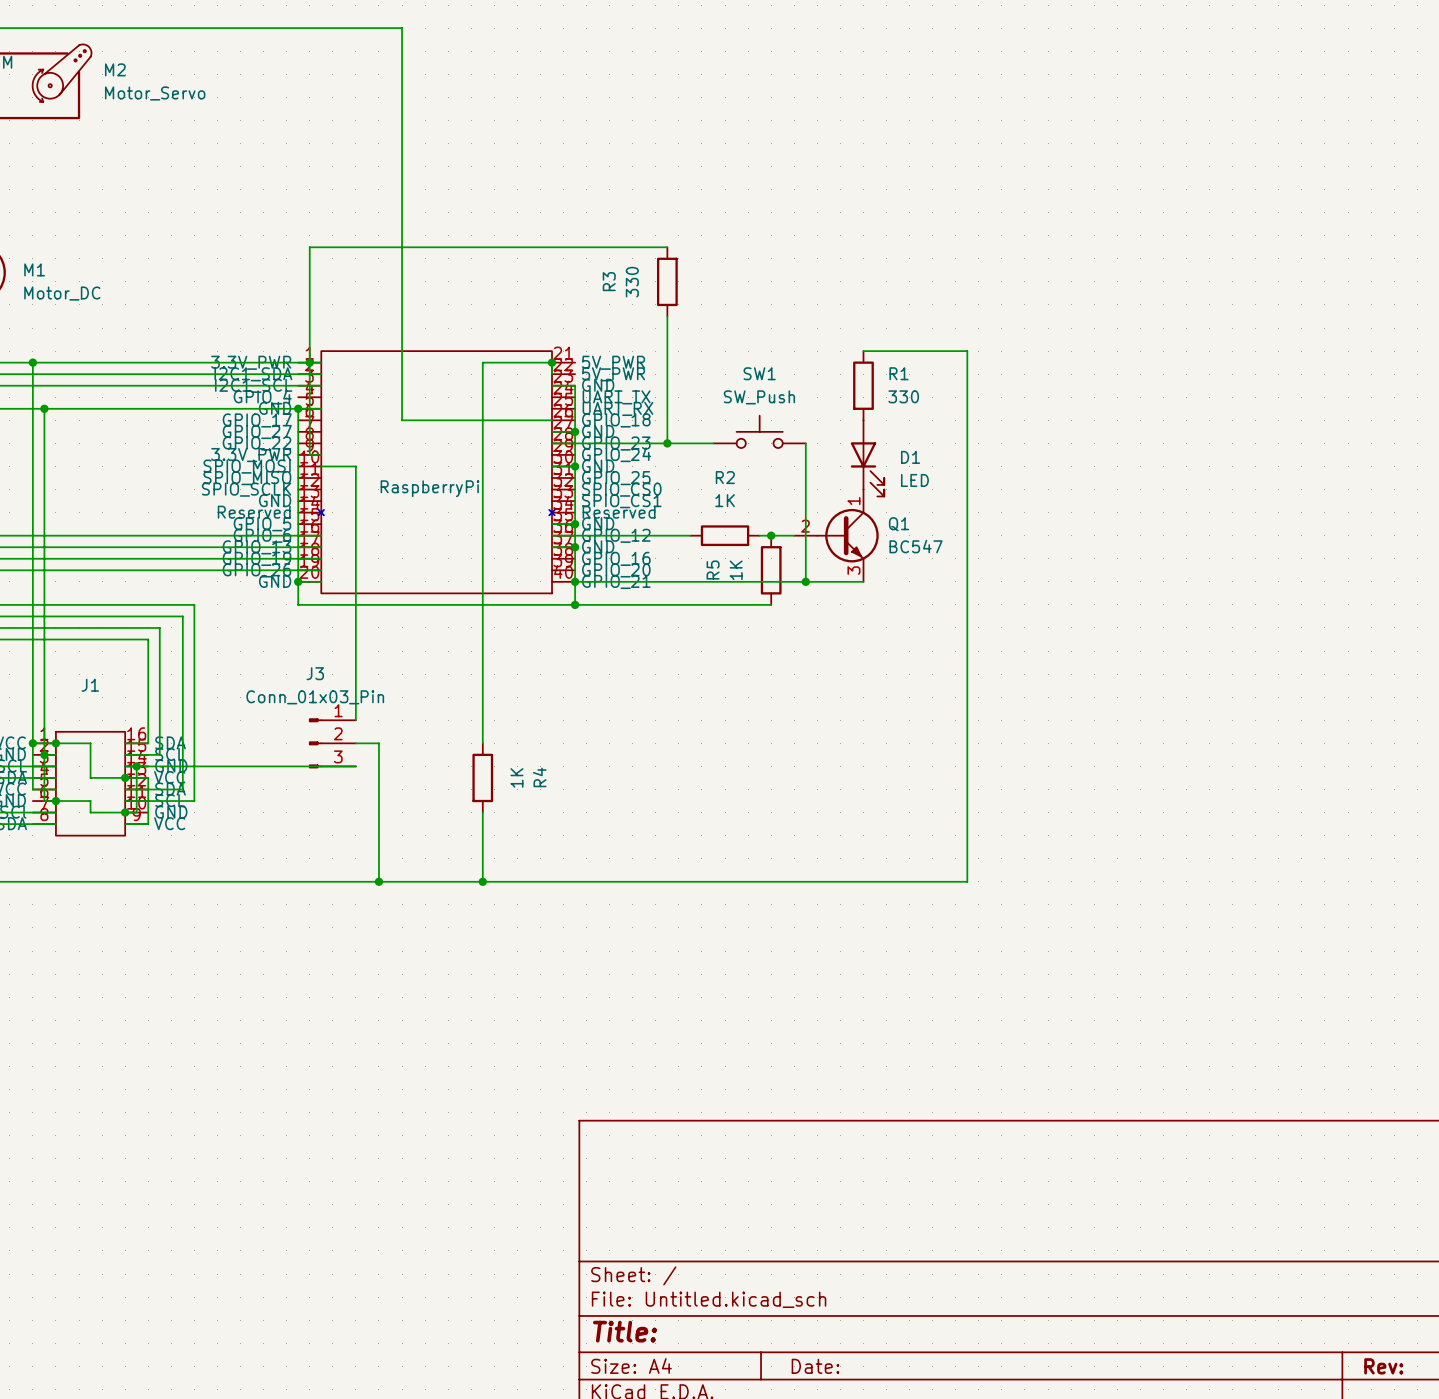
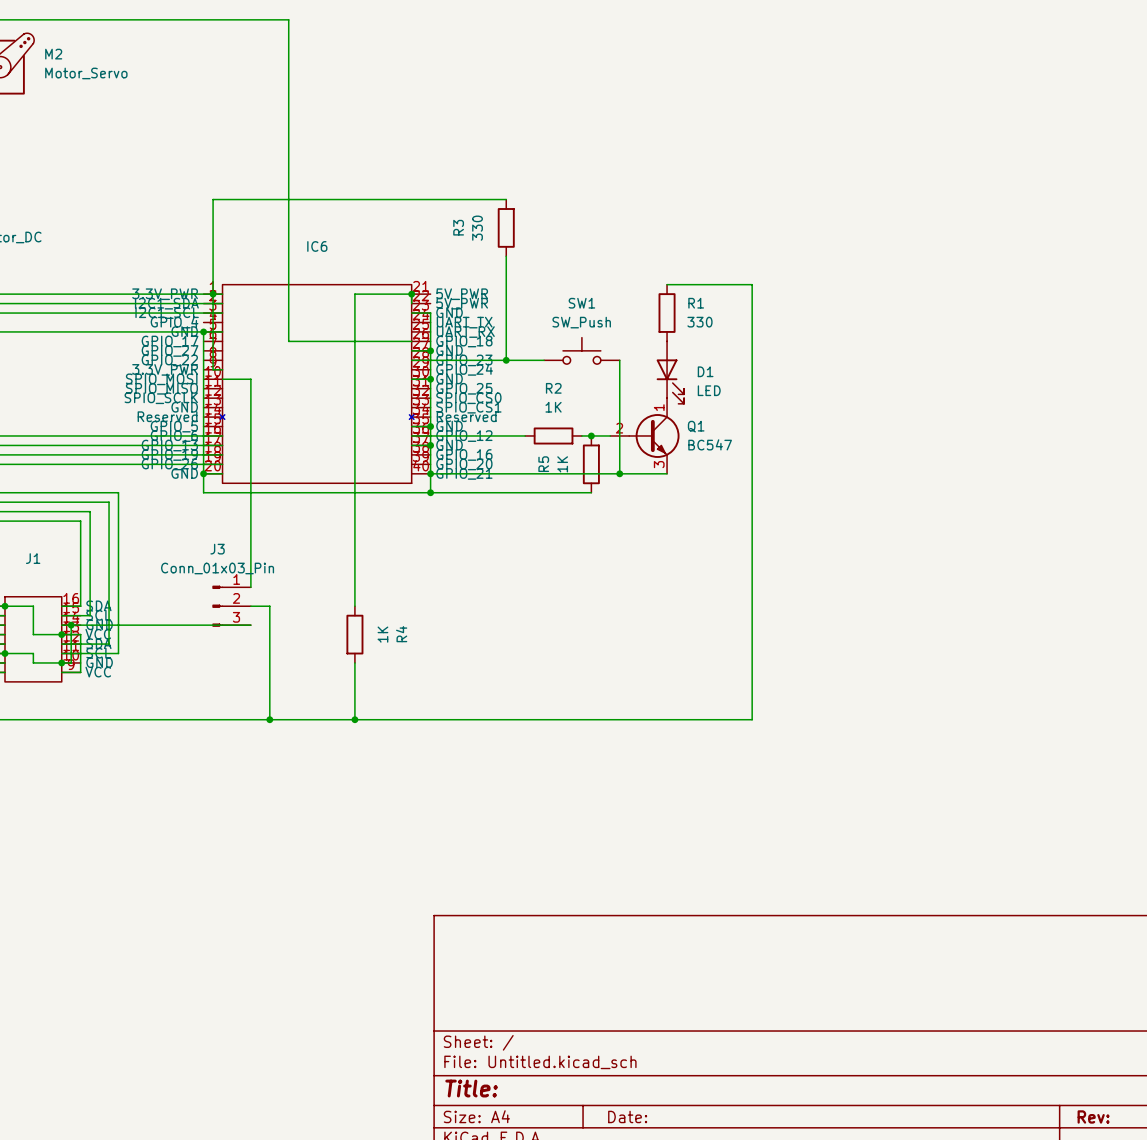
RaspberryPi name: RaspberryPi (429, 488) -> IC6 (317, 246)

